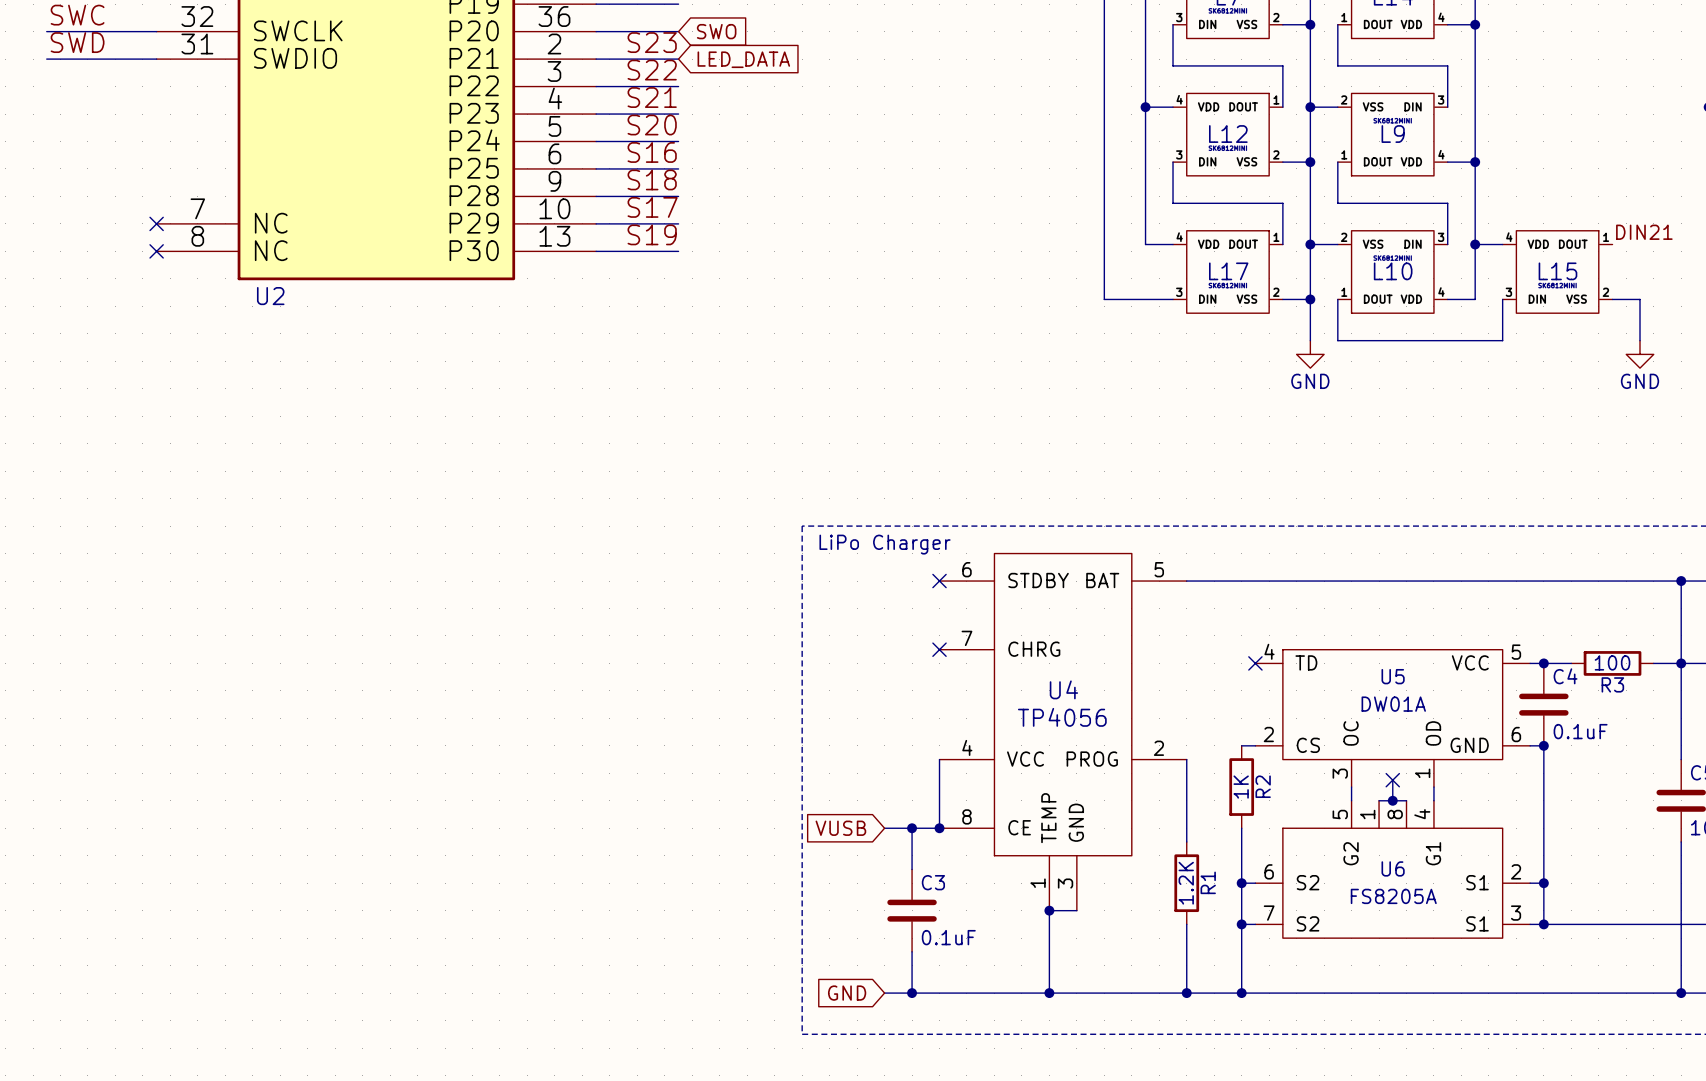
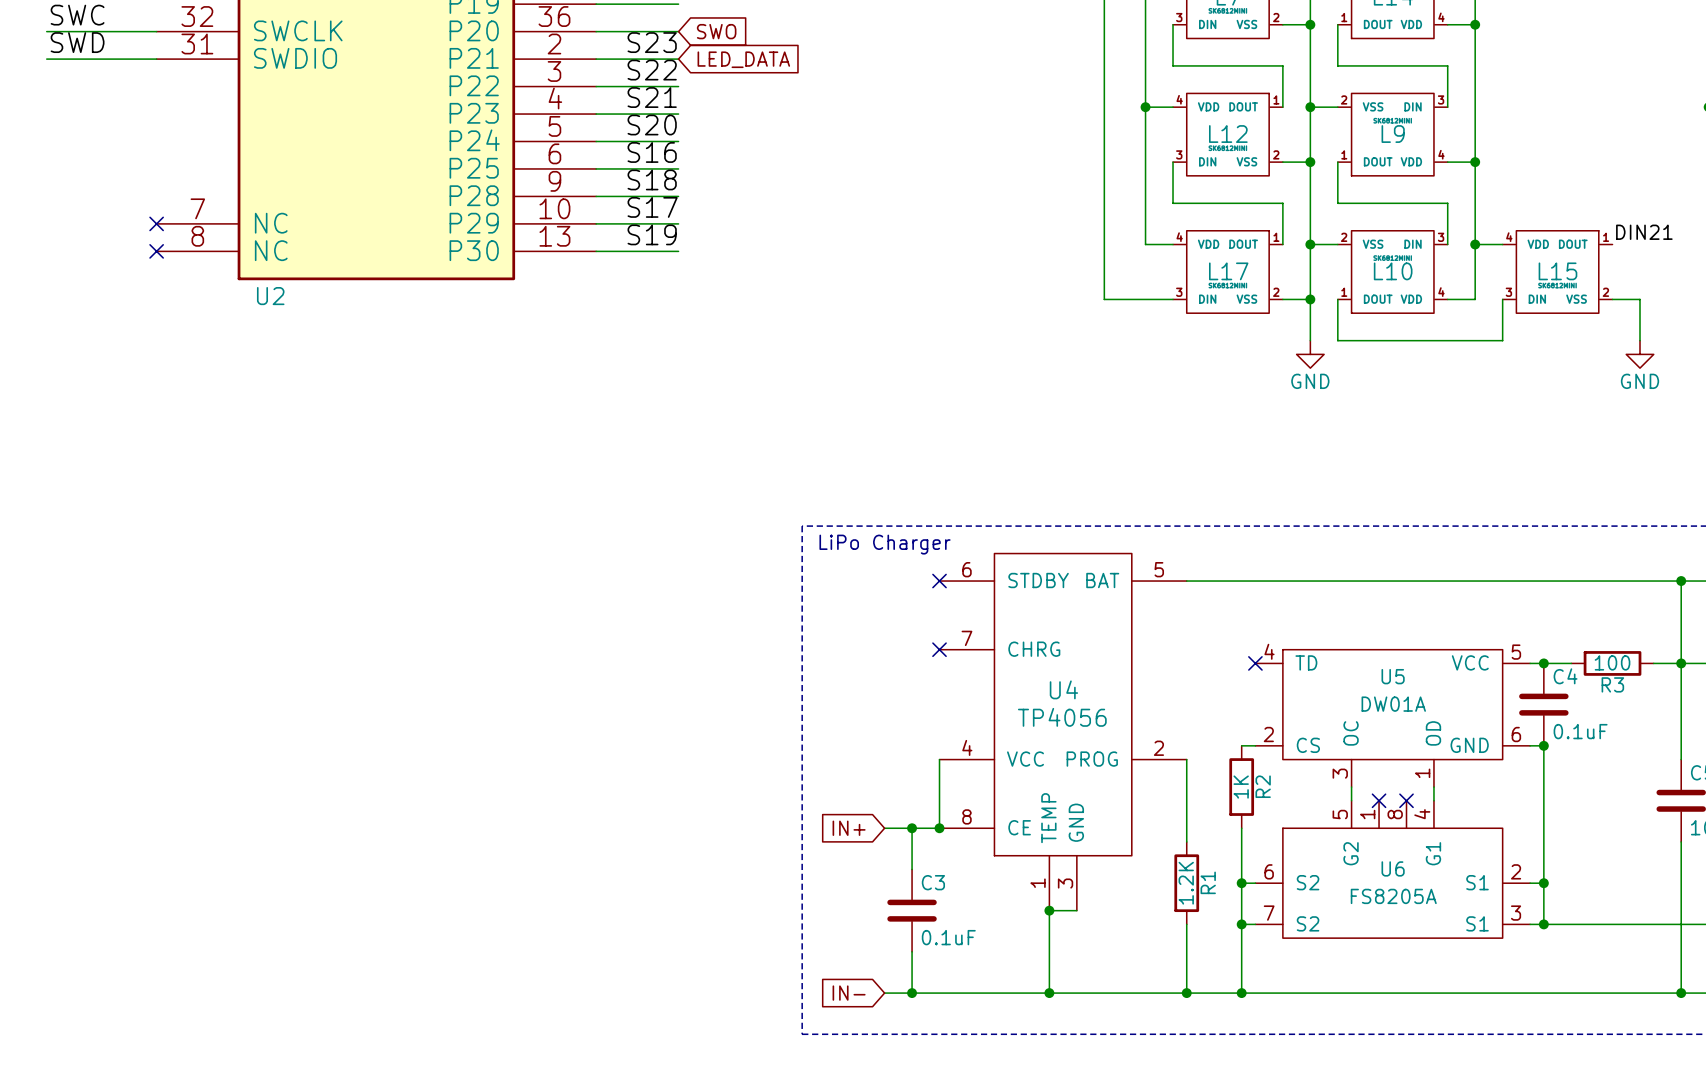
wire: (1392, 780) (1392, 800) -> none
no-connect mark: (1392, 780) -> none
wire: (1379, 800) (1406, 800) -> none
no-connect mark: none -> (1379, 800)
junction: (1392, 800) -> none
no-connect mark: none -> (1406, 800)
global label: VUSB (840, 828) -> IN+ (849, 828)
global label: GND (847, 993) -> IN- (849, 993)

